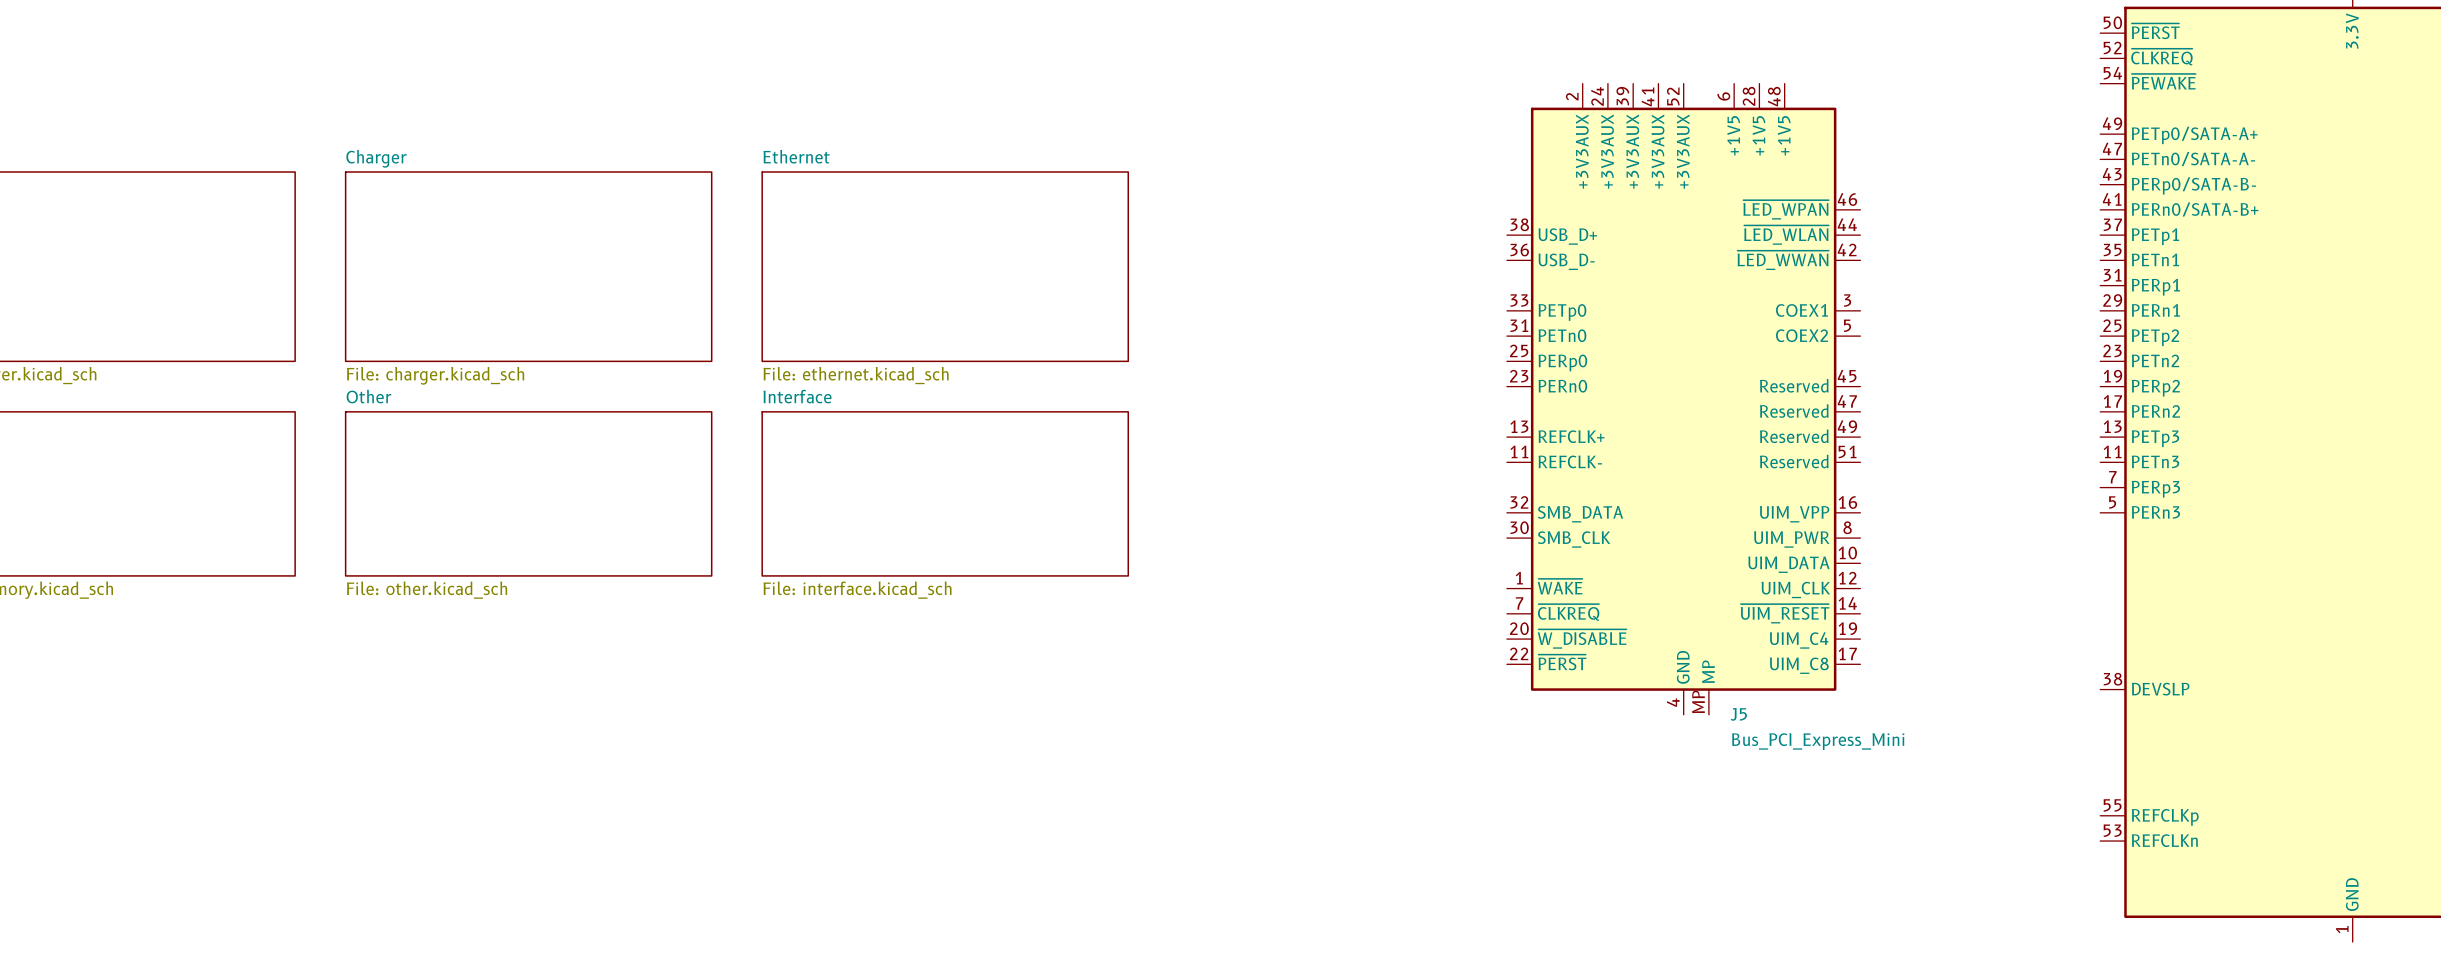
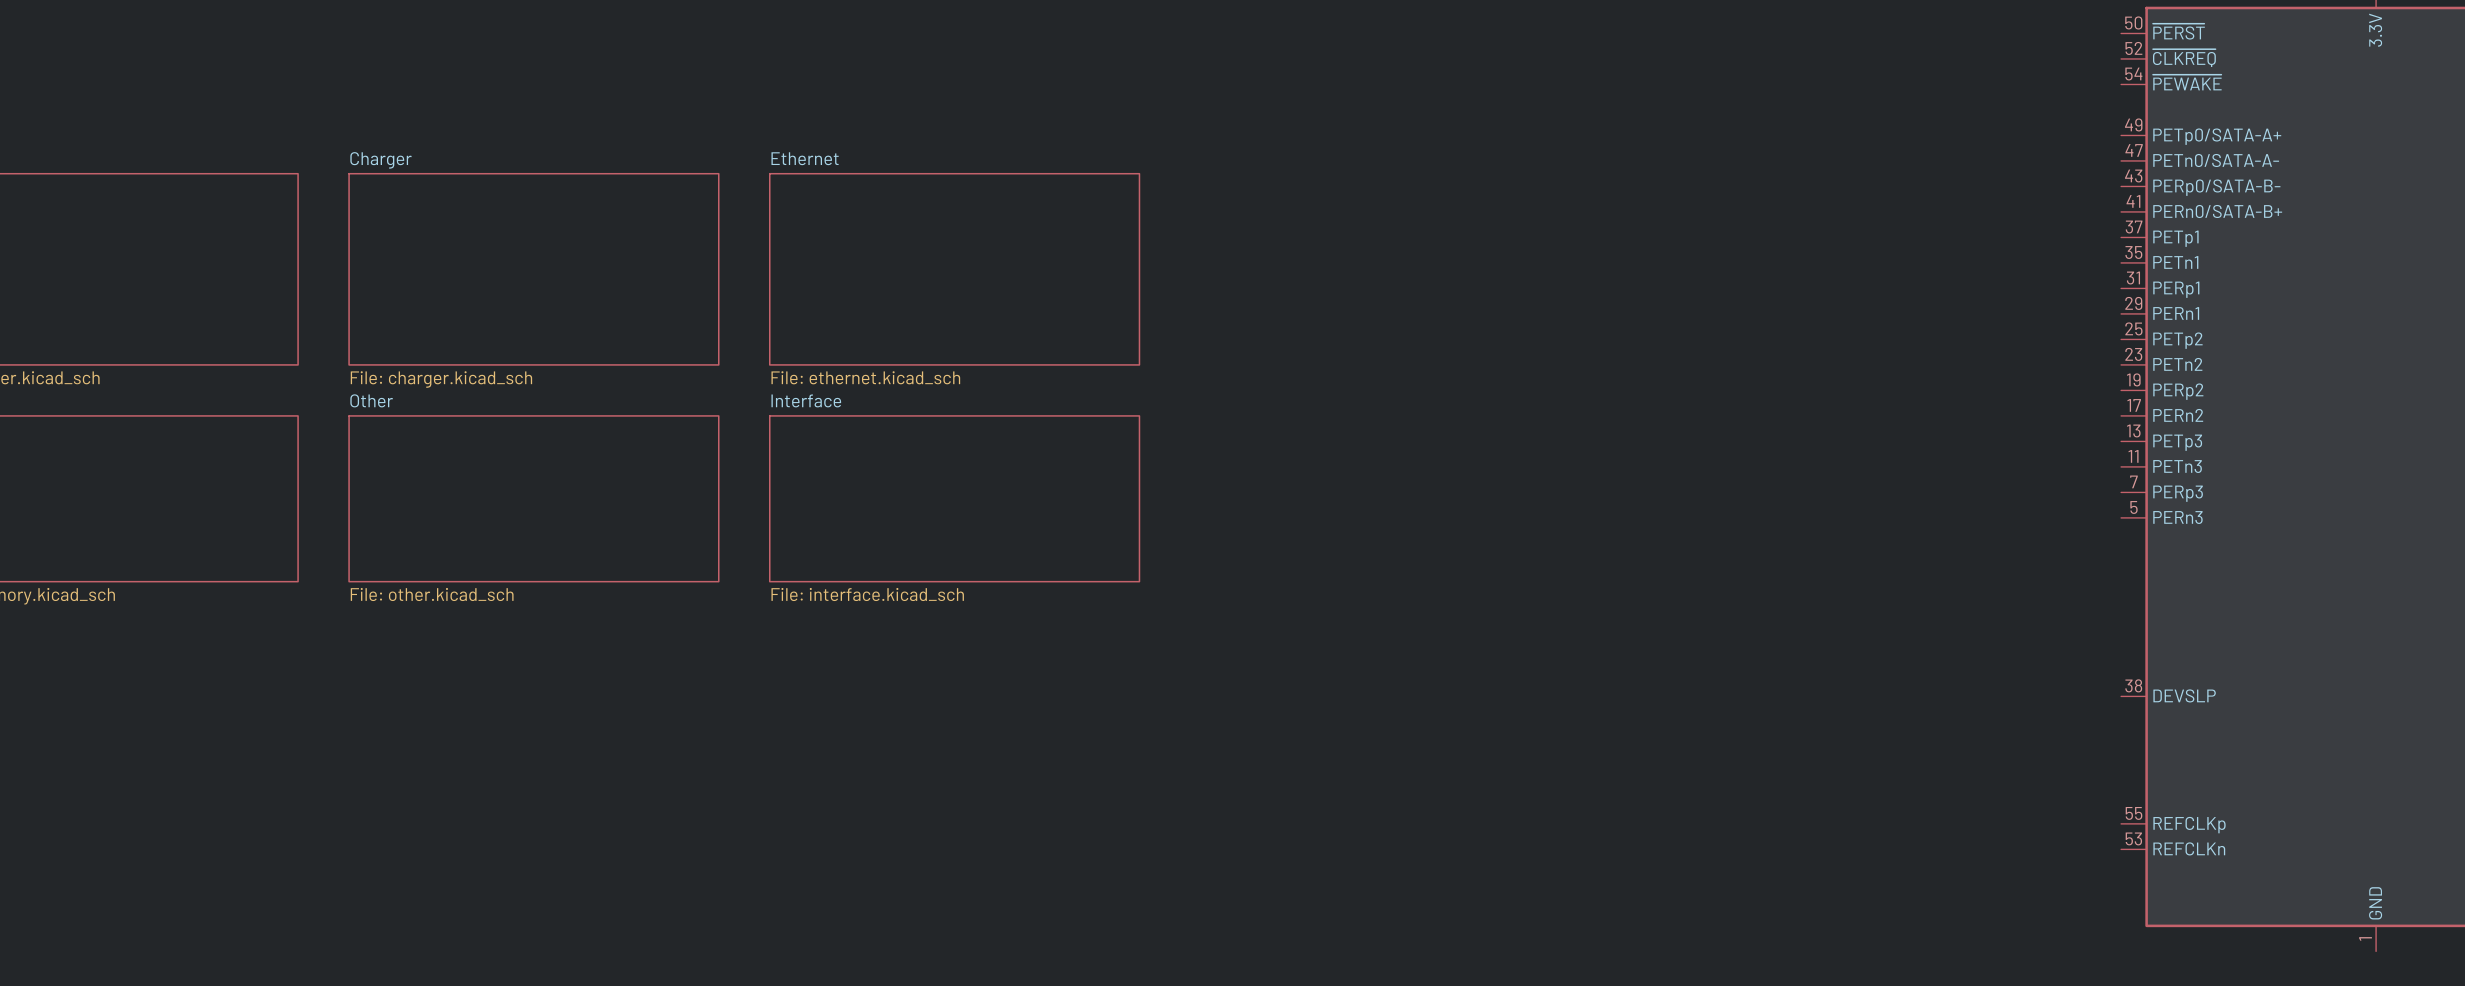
J5: Bus_PCI_Express_Mini (1683, 399) -> none

